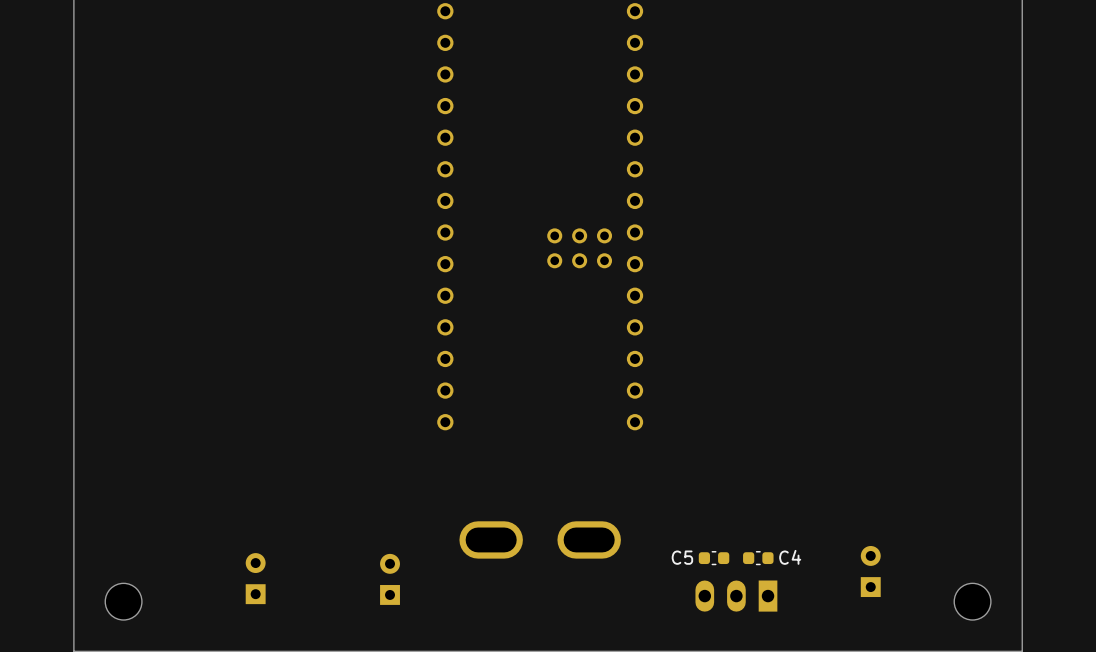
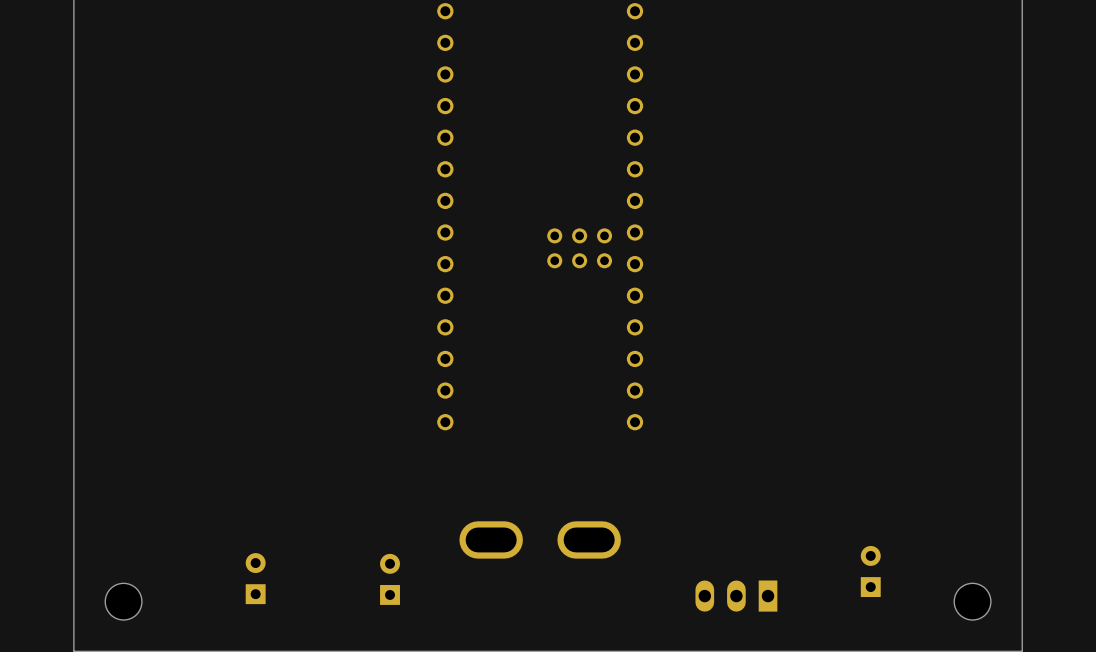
C5: (714, 558) -> none
C4: (758, 558) -> none

